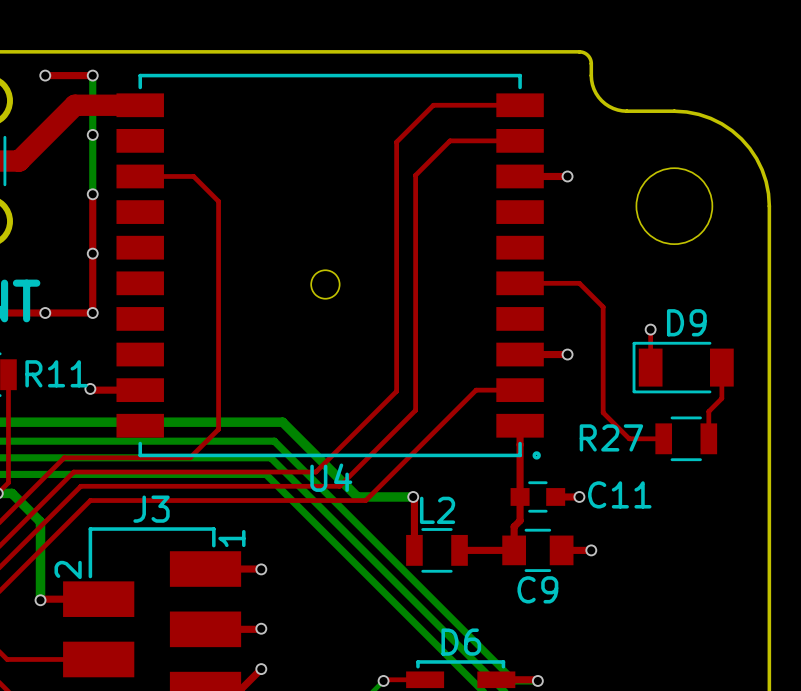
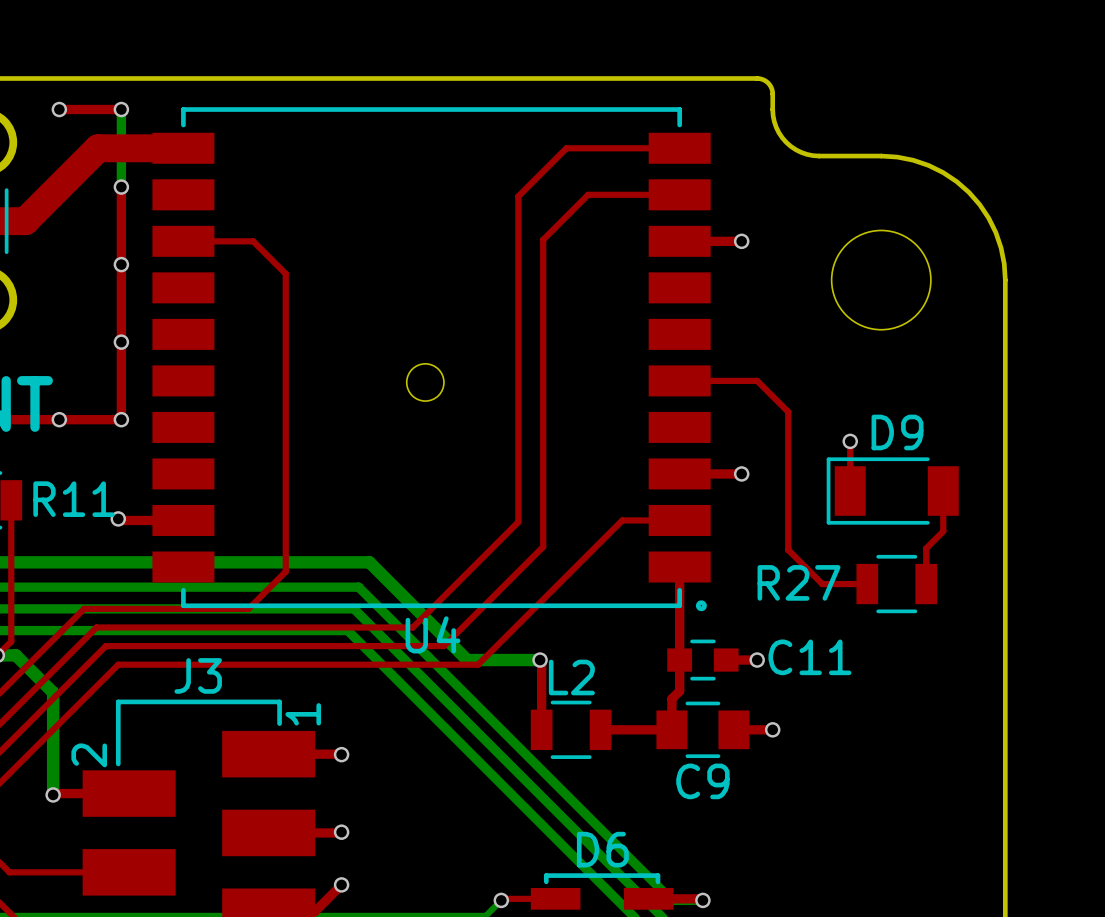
top track: none -> (121, 187) (121, 264)
bottom track: (92, 134) (92, 194) -> none

